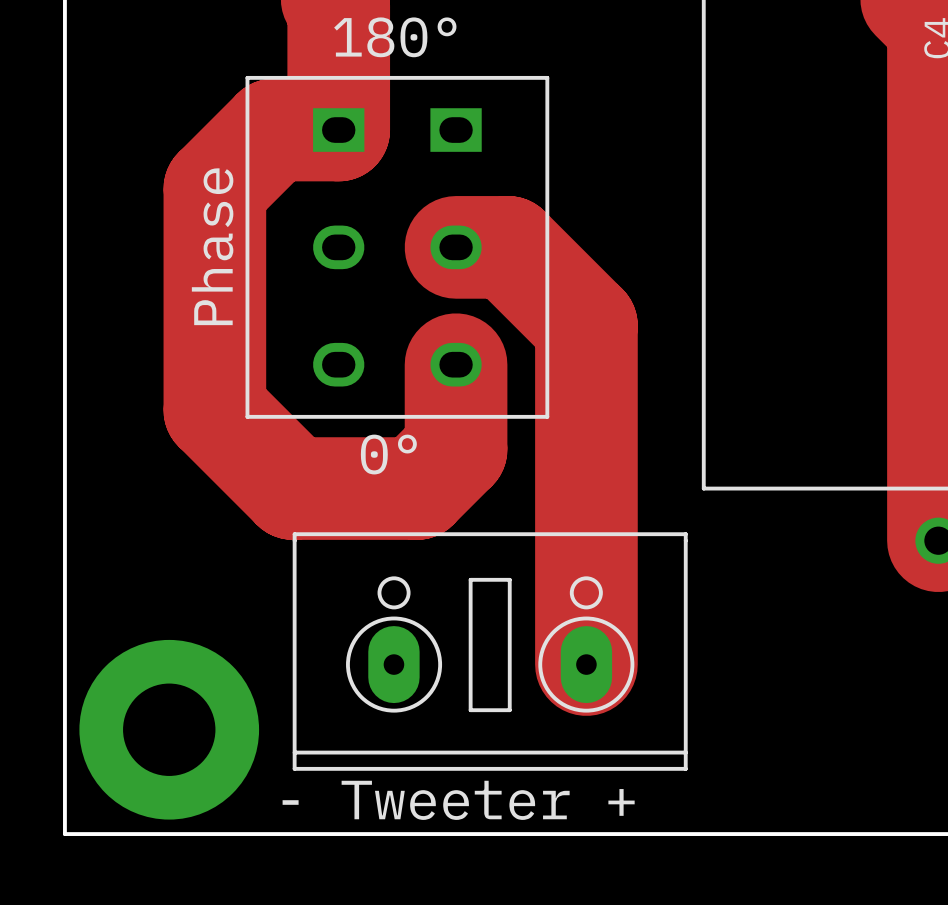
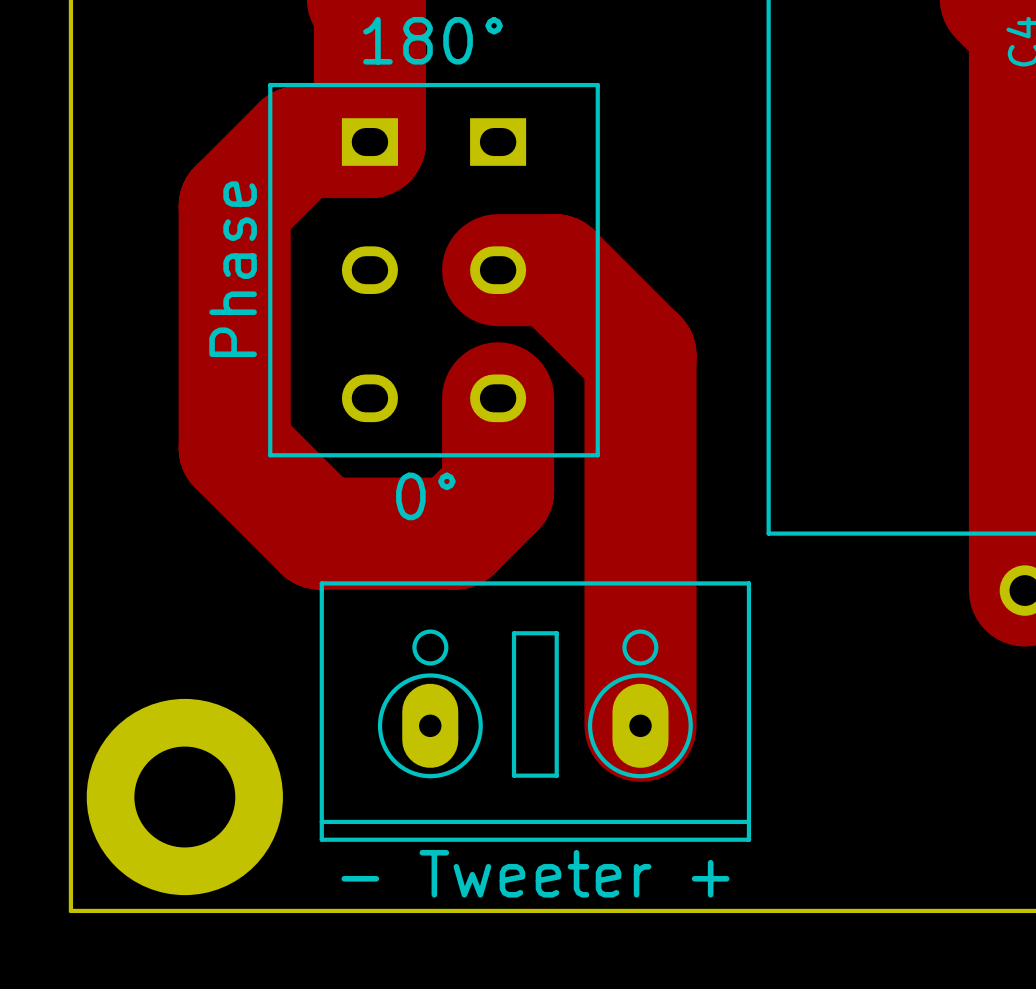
text position: - Tweeter + (458, 800) -> - Tweeter + (535, 873)

